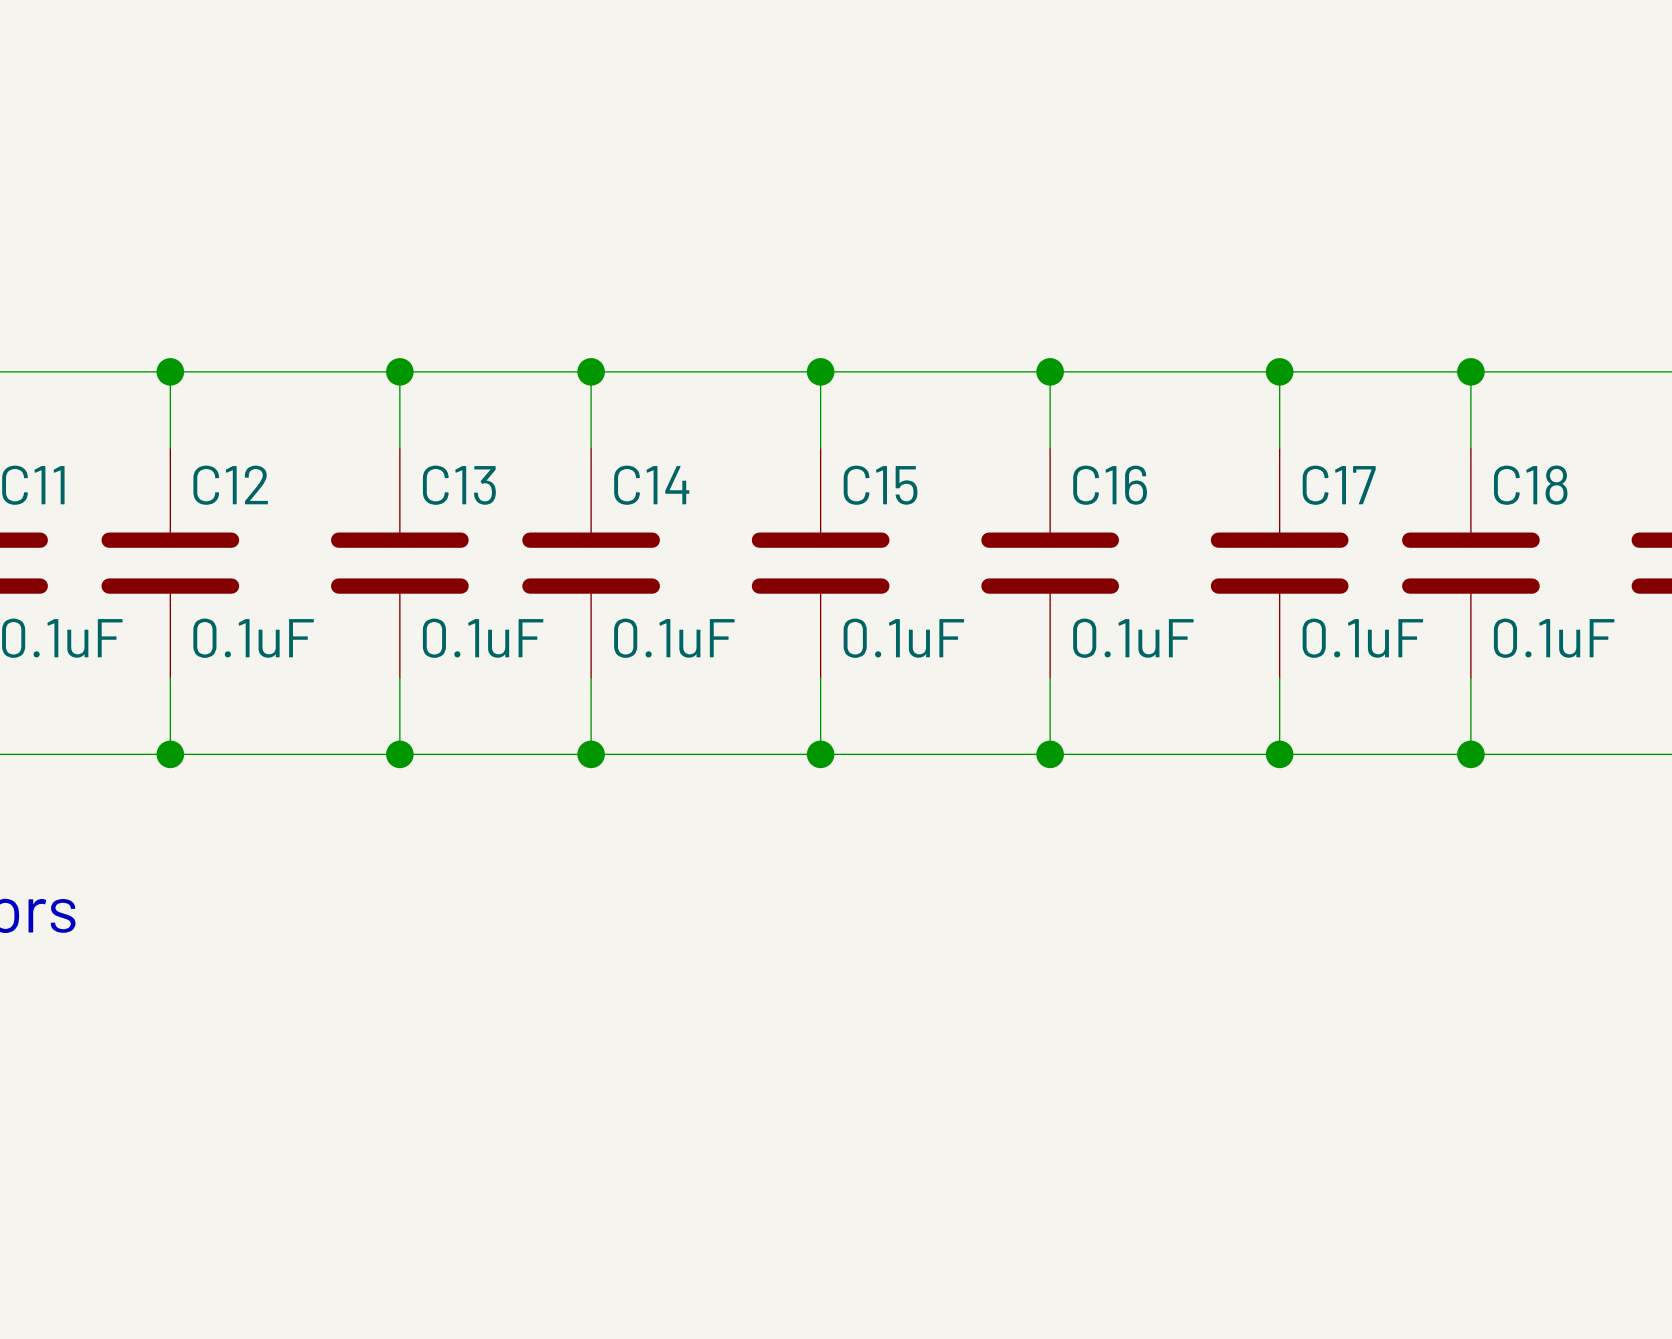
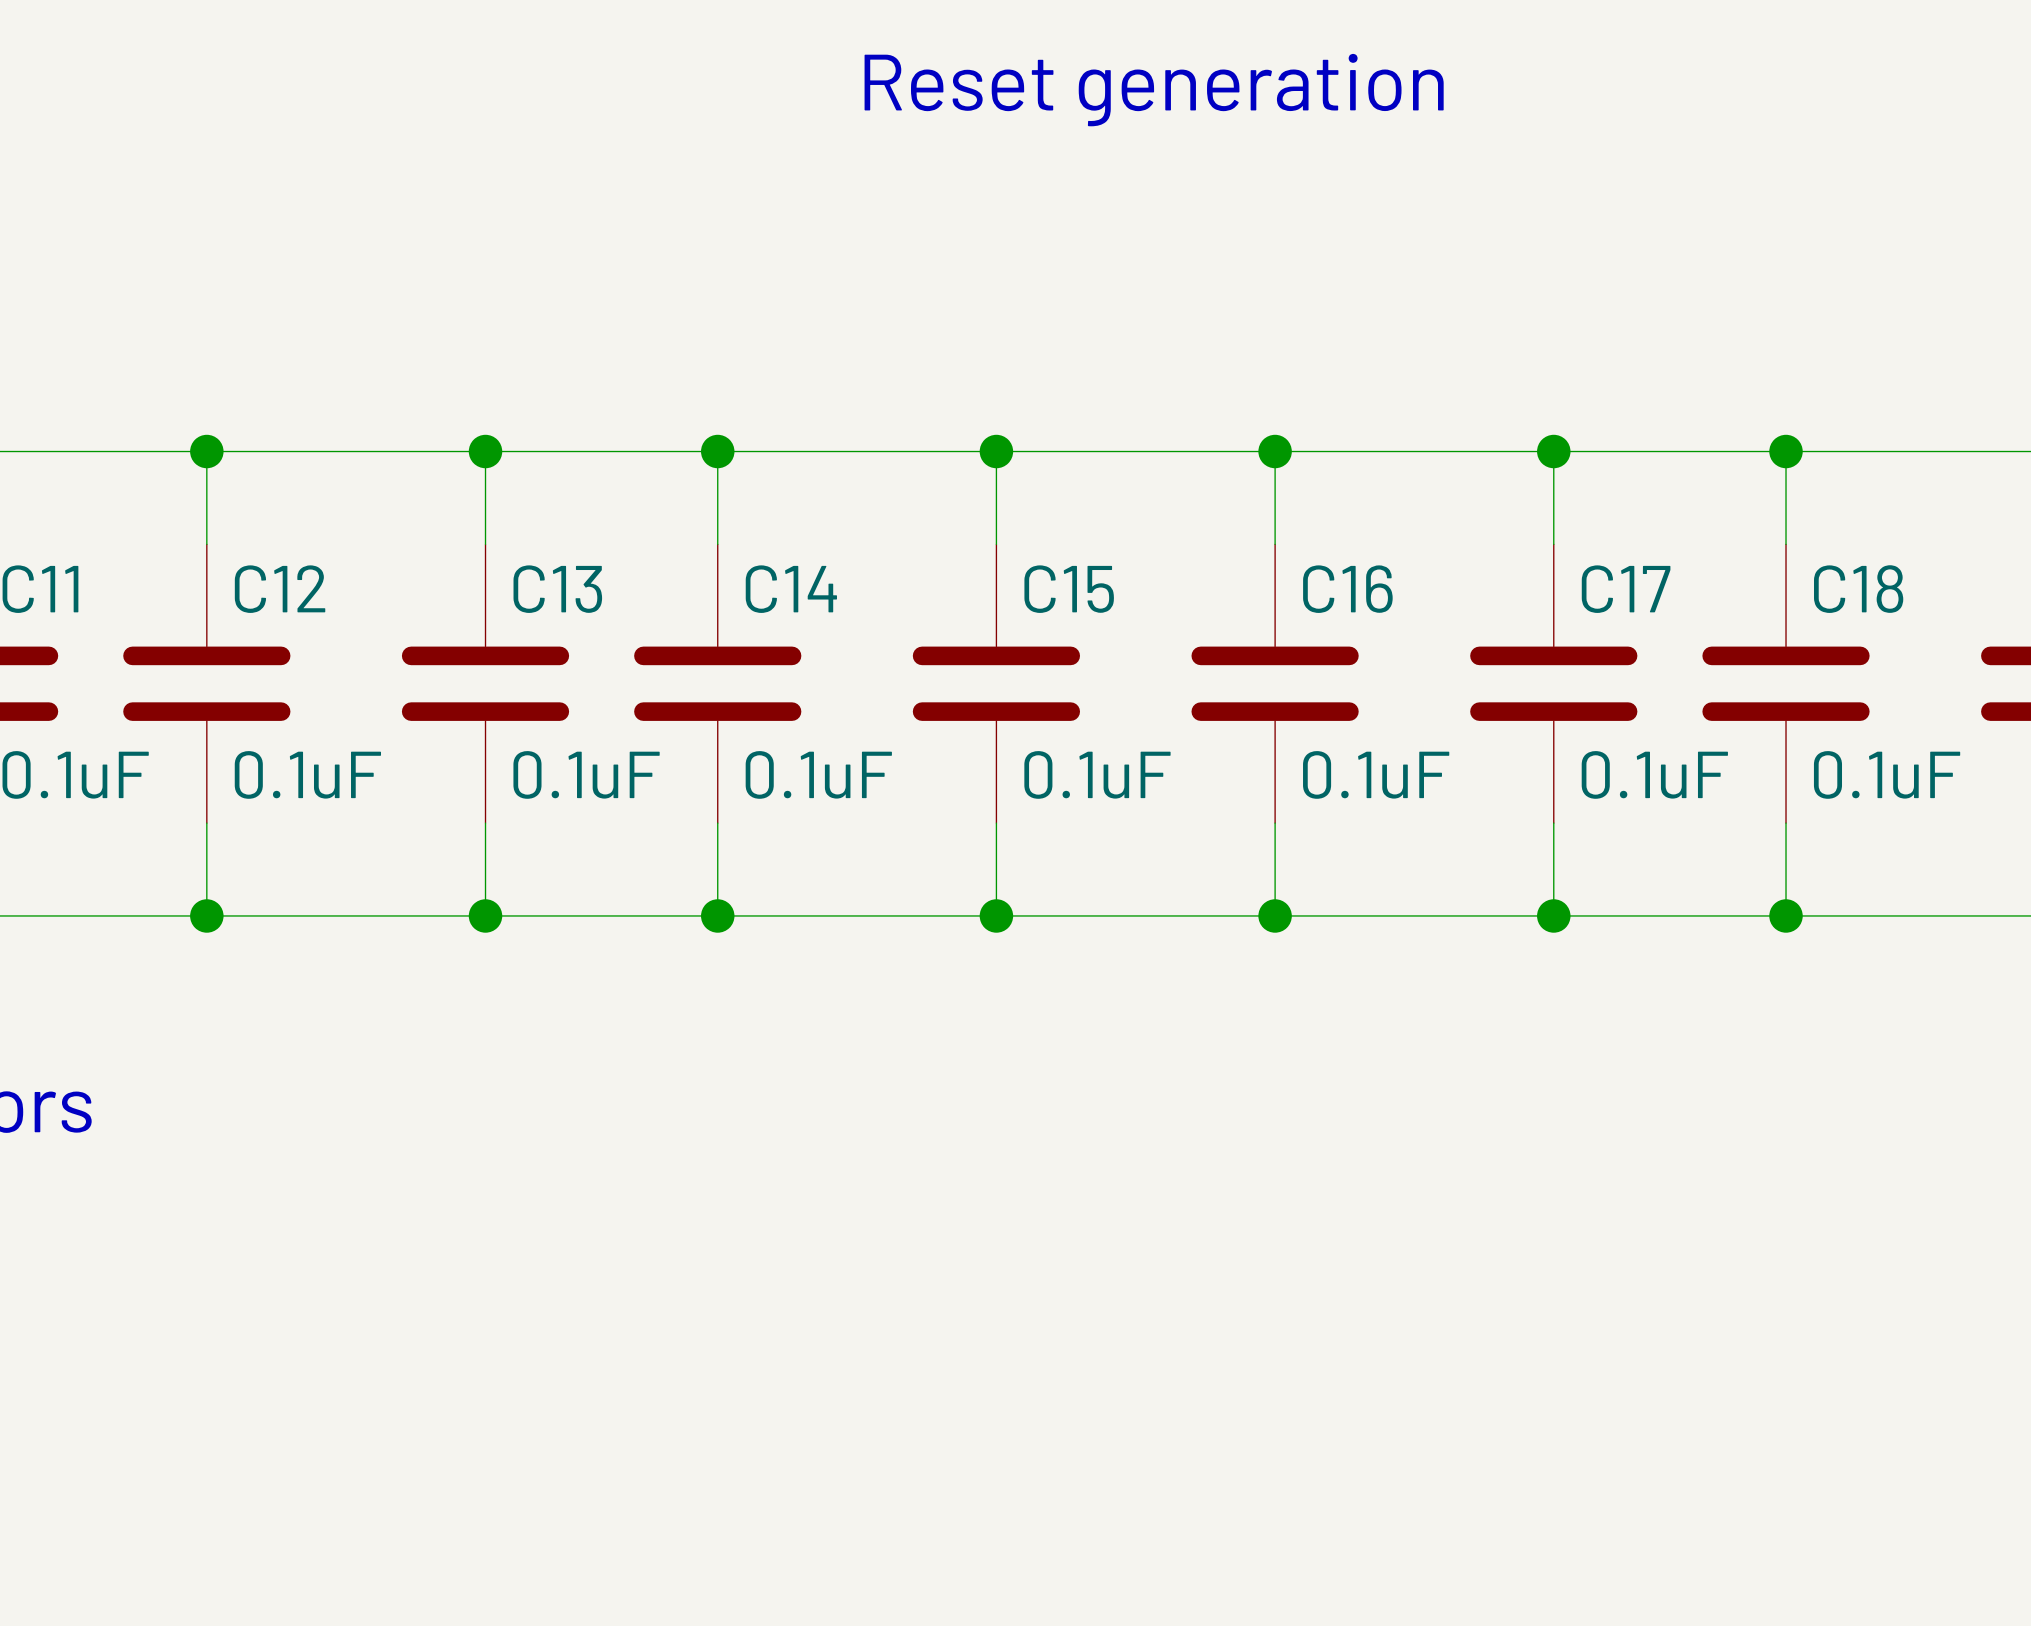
text: none -> Reset generation (1154, 90)

